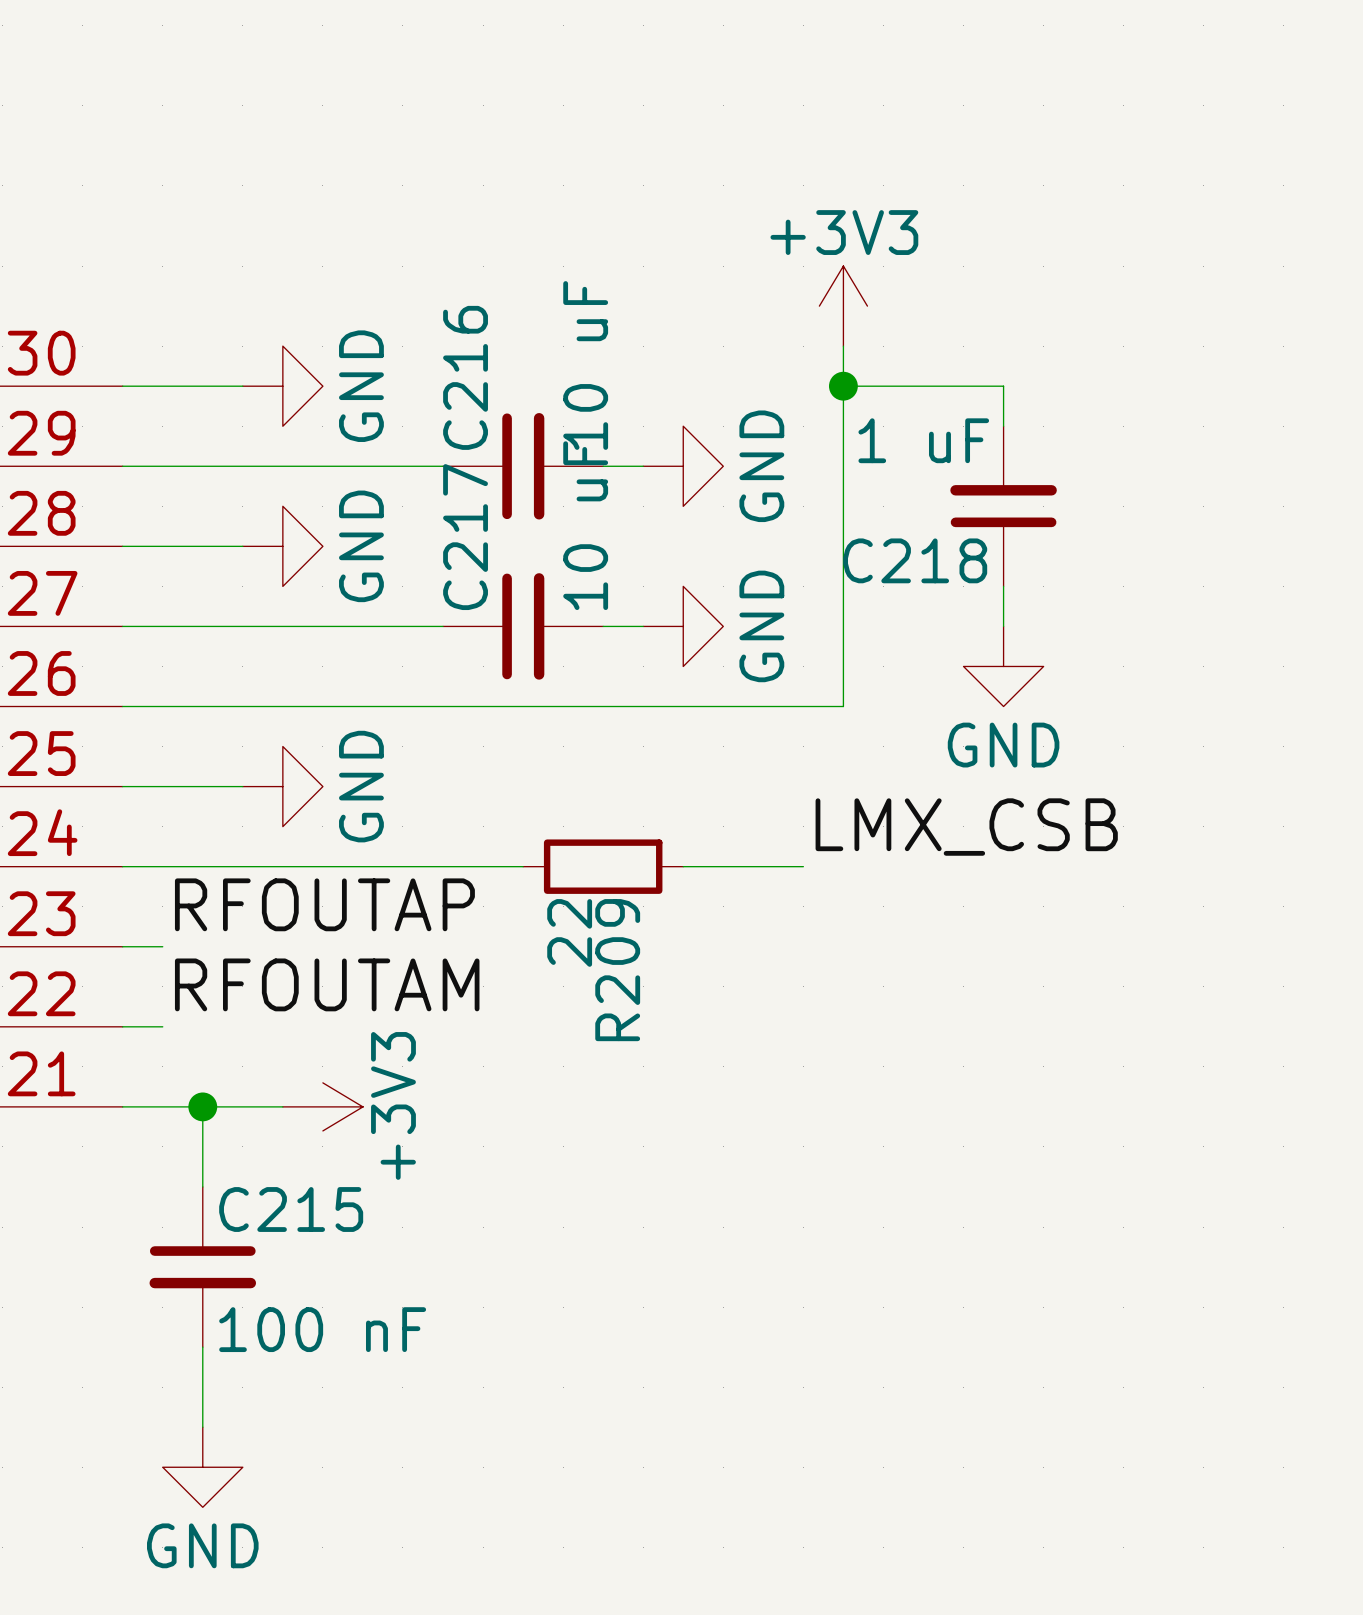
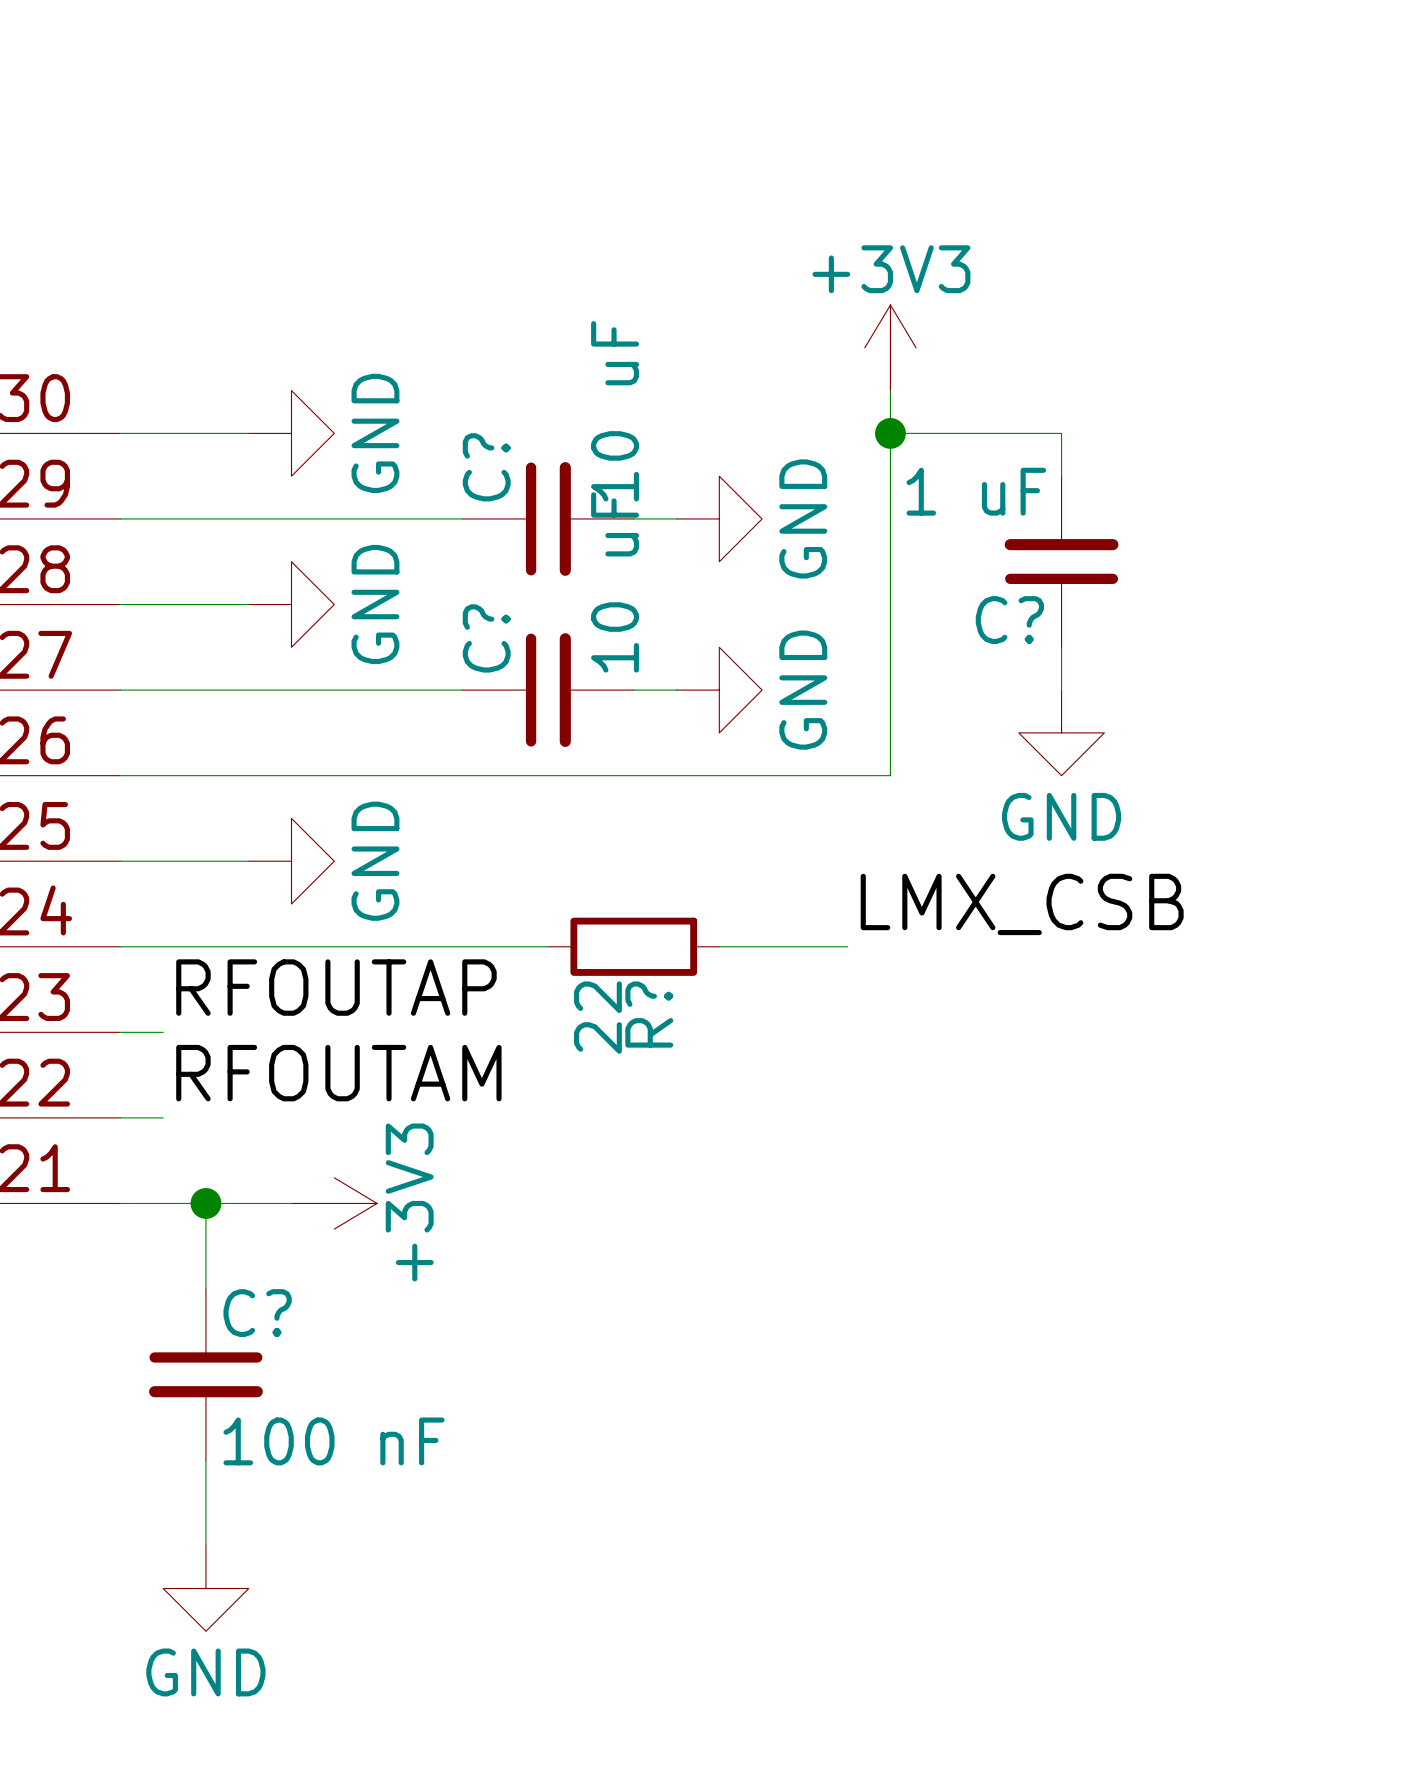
C216 name: C216 (465, 377) -> C? (486, 467)
C217 name: C217 (465, 537) -> C? (486, 638)
C218 name: C218 (915, 560) -> C? (1009, 620)
R209 name: R209 (617, 970) -> R? (649, 1014)
C215 name: C215 (291, 1209) -> C? (257, 1313)

